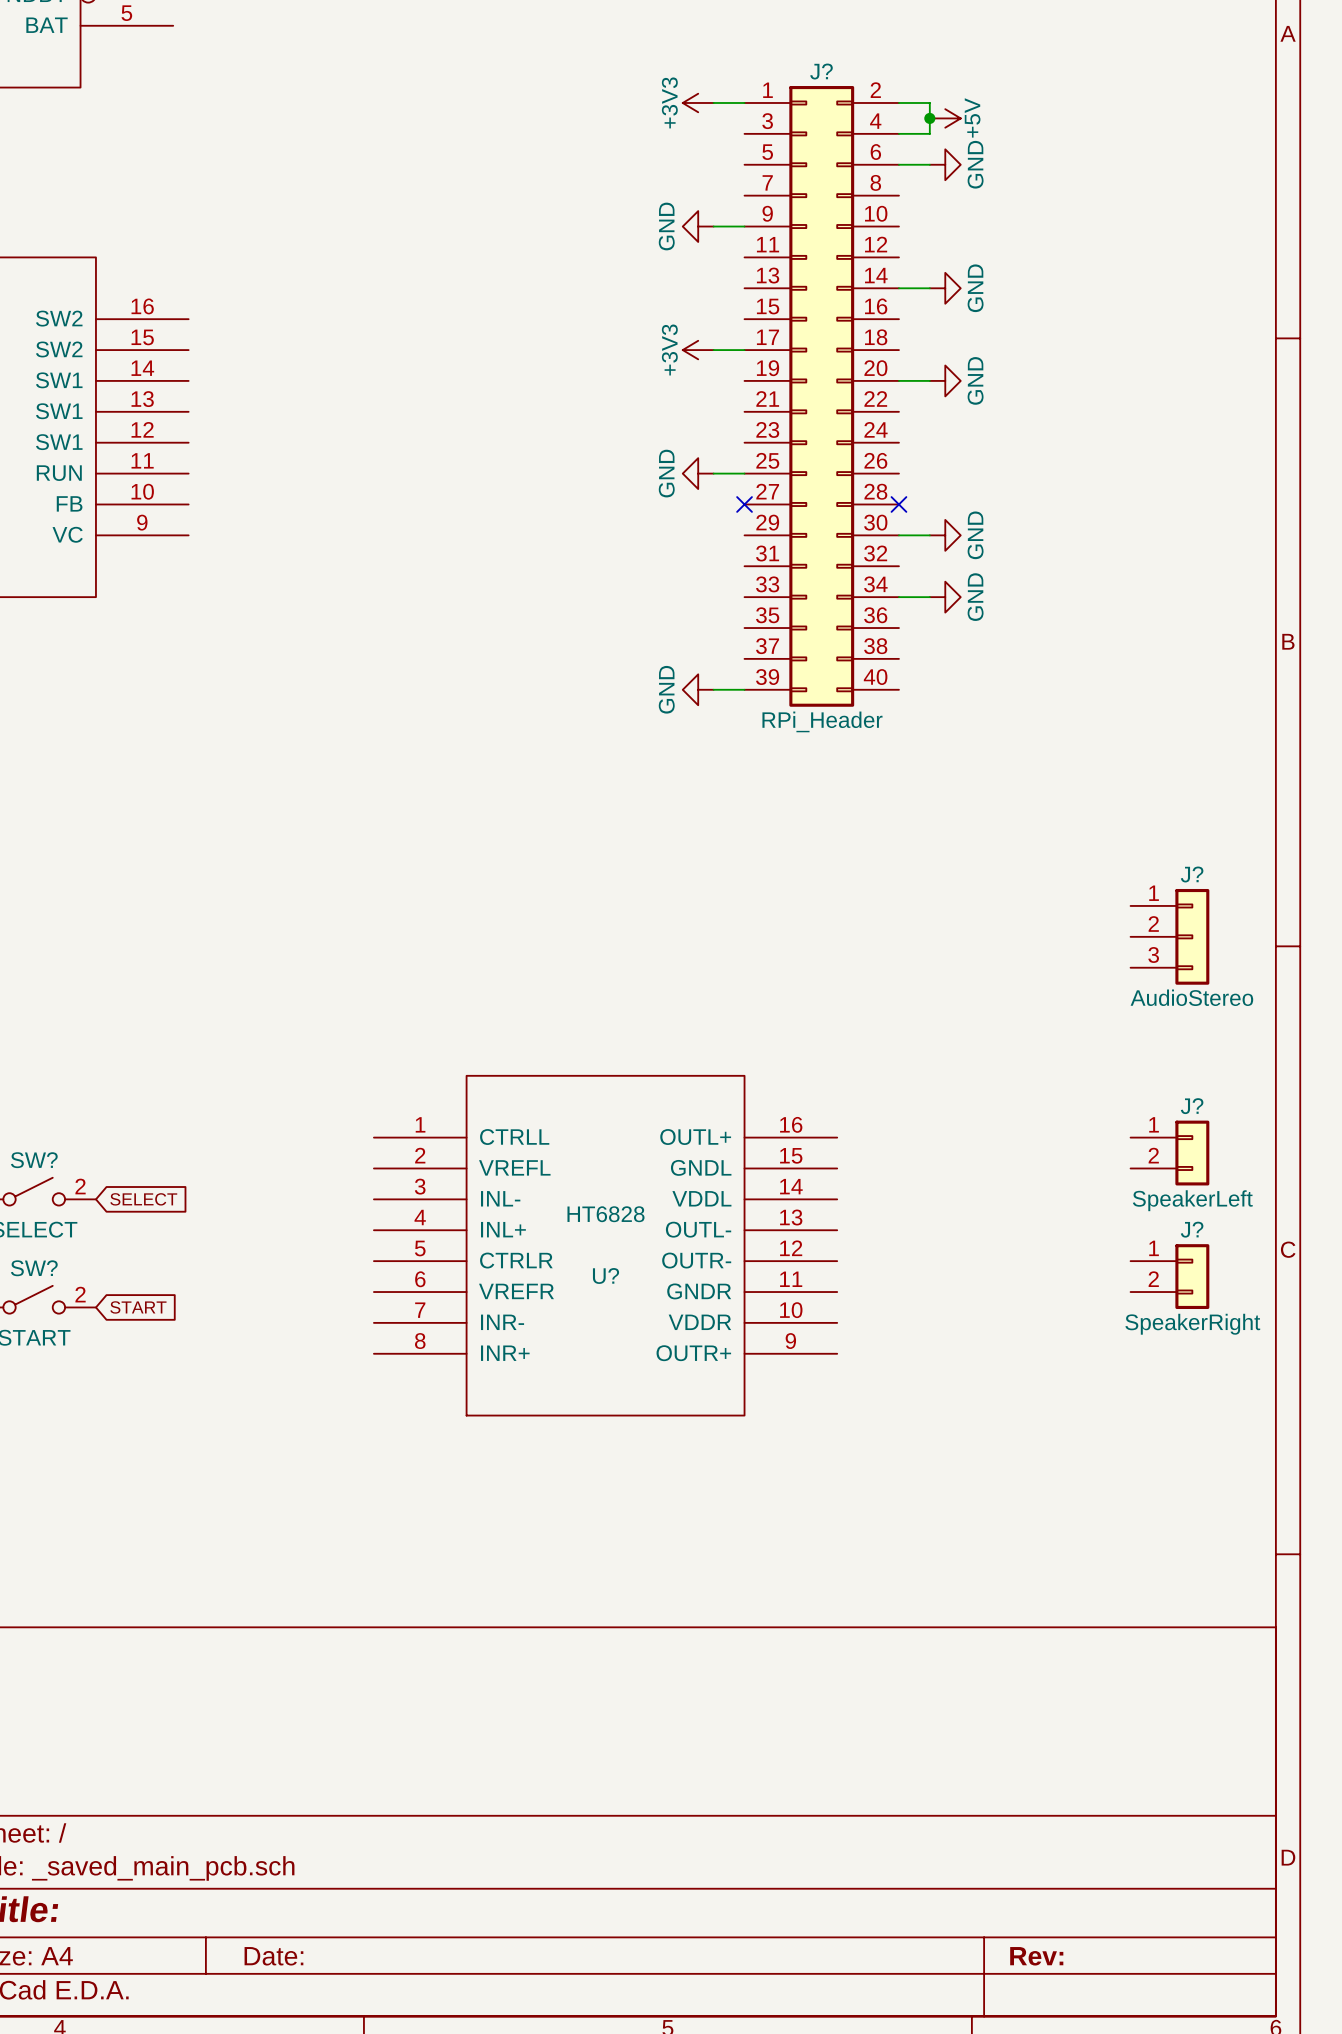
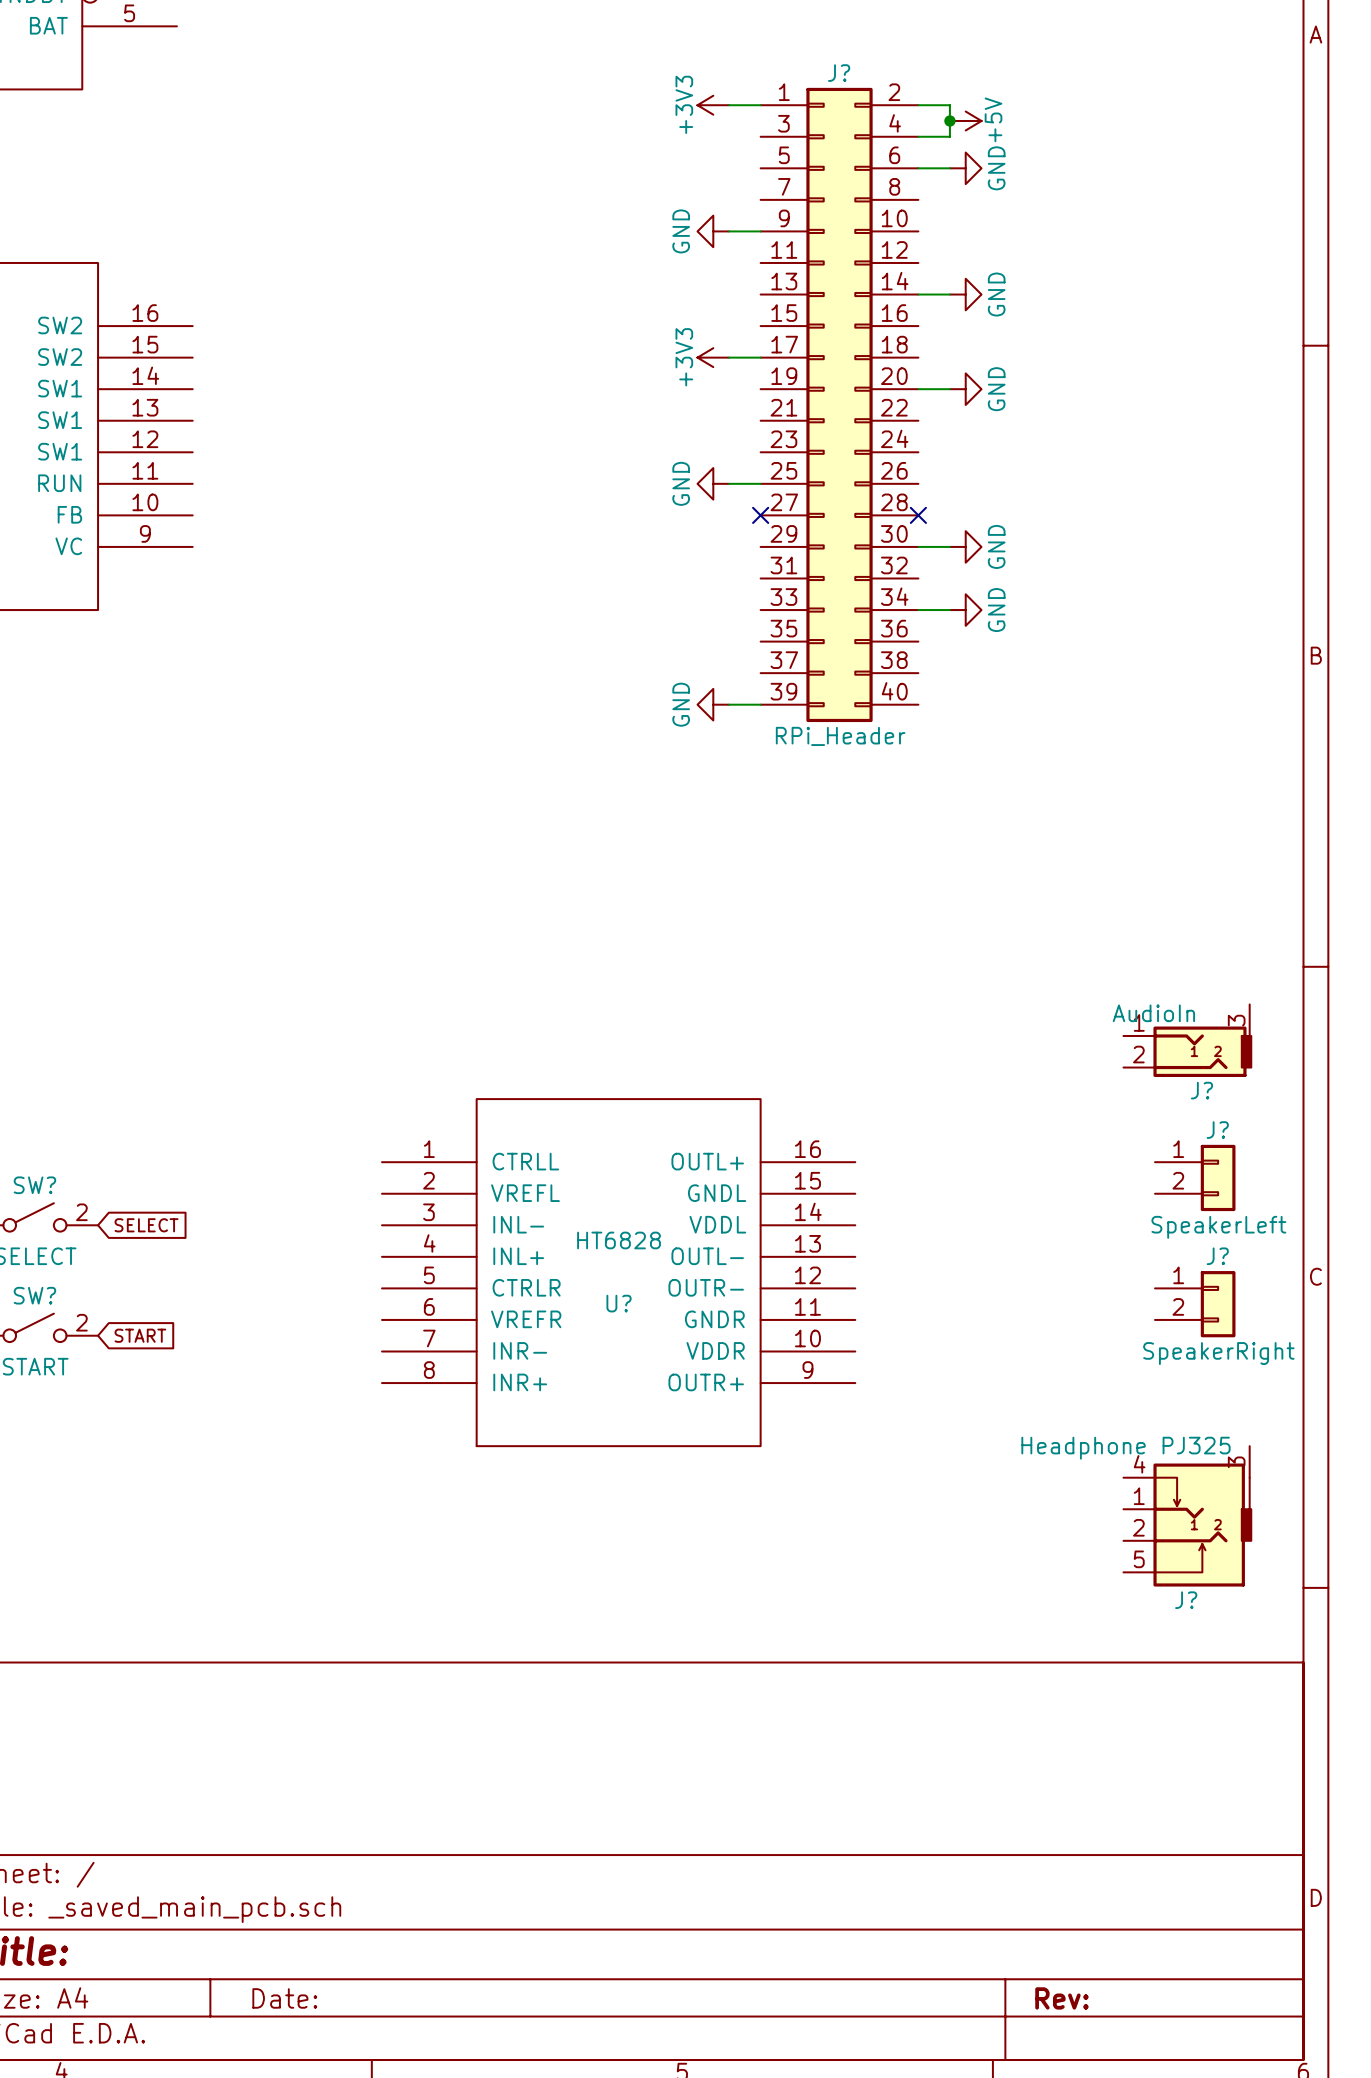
J?: AudioStereo (1169, 936) -> none
J?: none -> AudioIn (1187, 1040)
J?: none -> Headphone PJ325 (1187, 1516)

